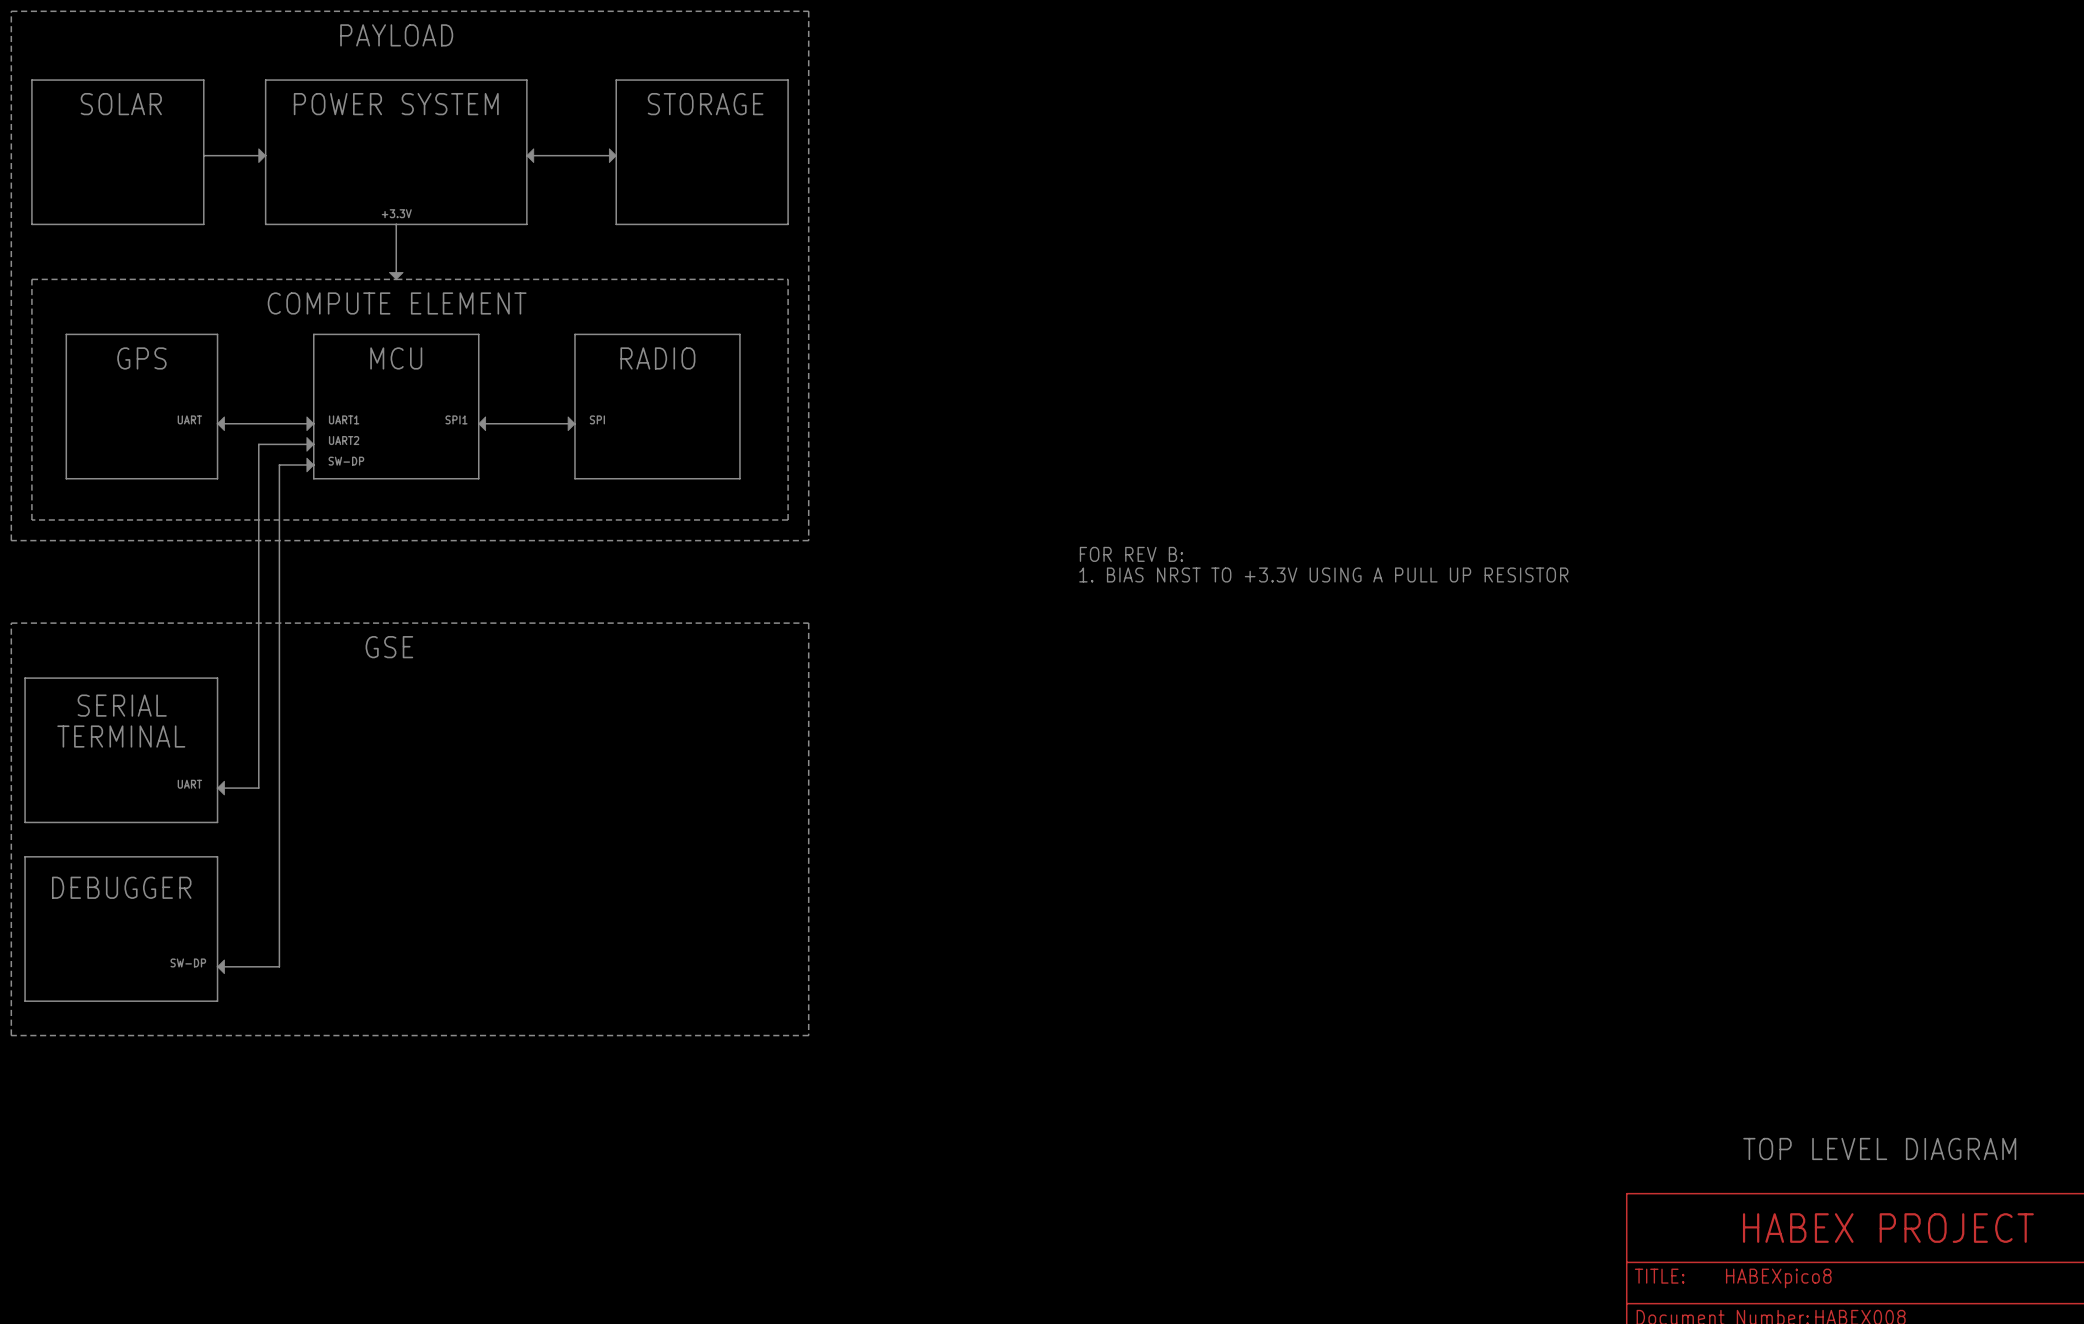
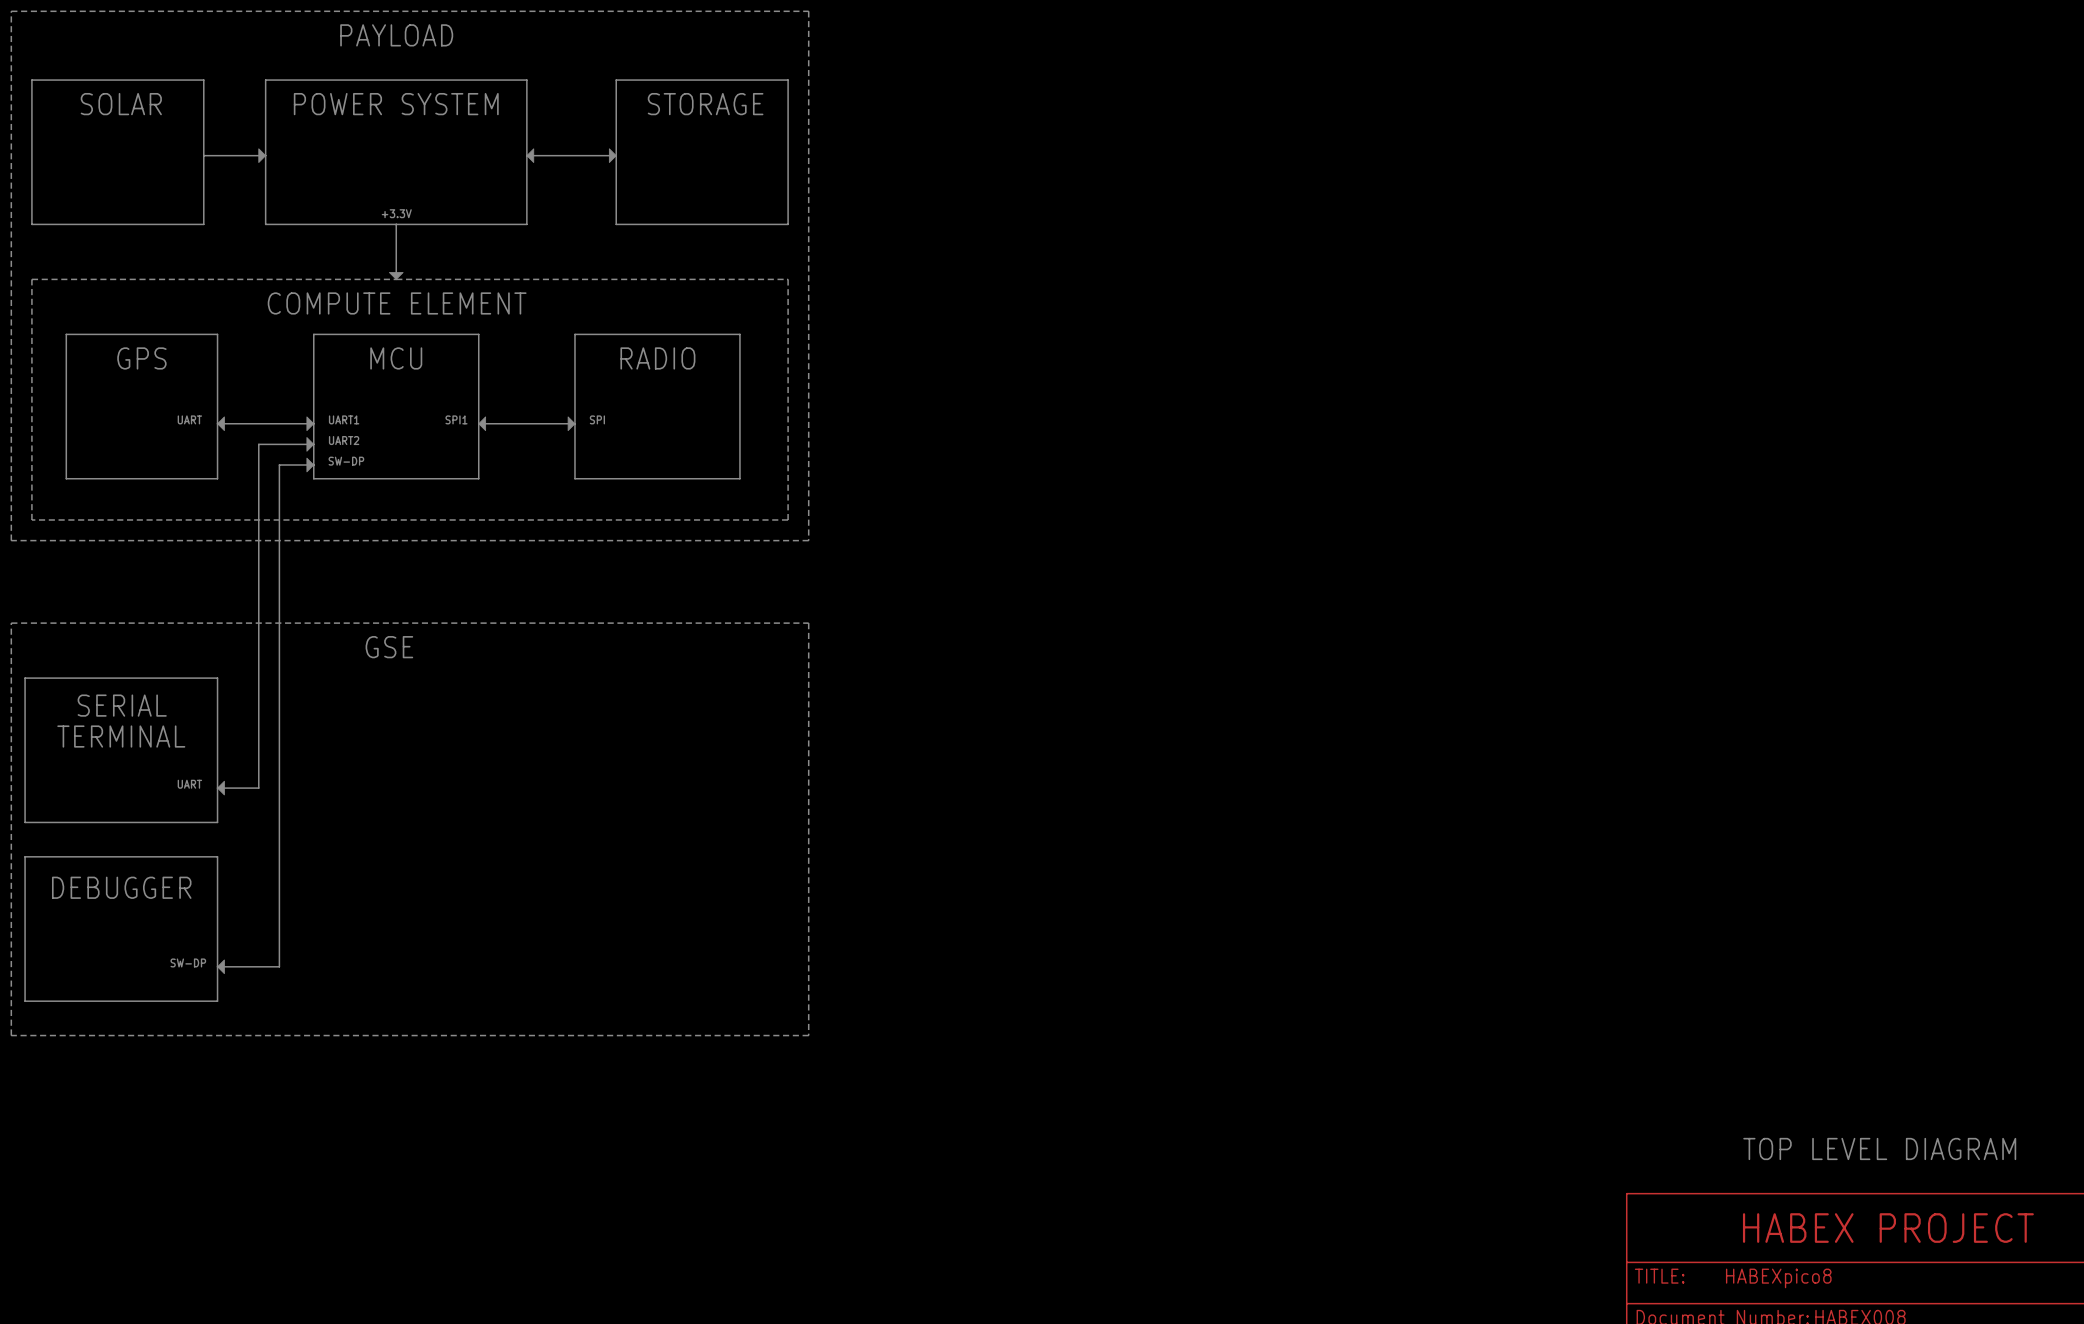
text: FOR REV B: (1131, 554) -> none
text: 1. BIAS NRST TO +3.3V USING A PULL UP RESISTOR (1323, 574) -> none

